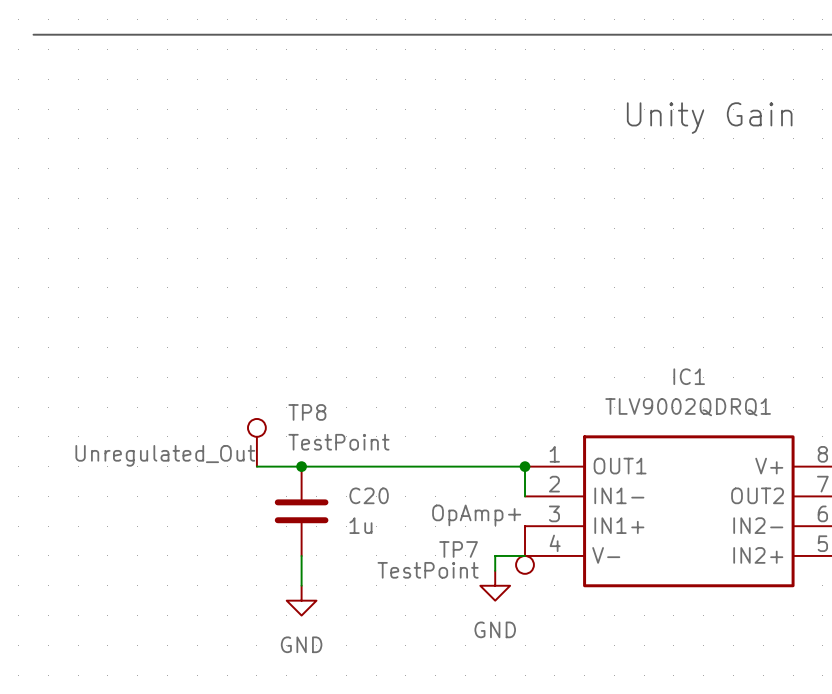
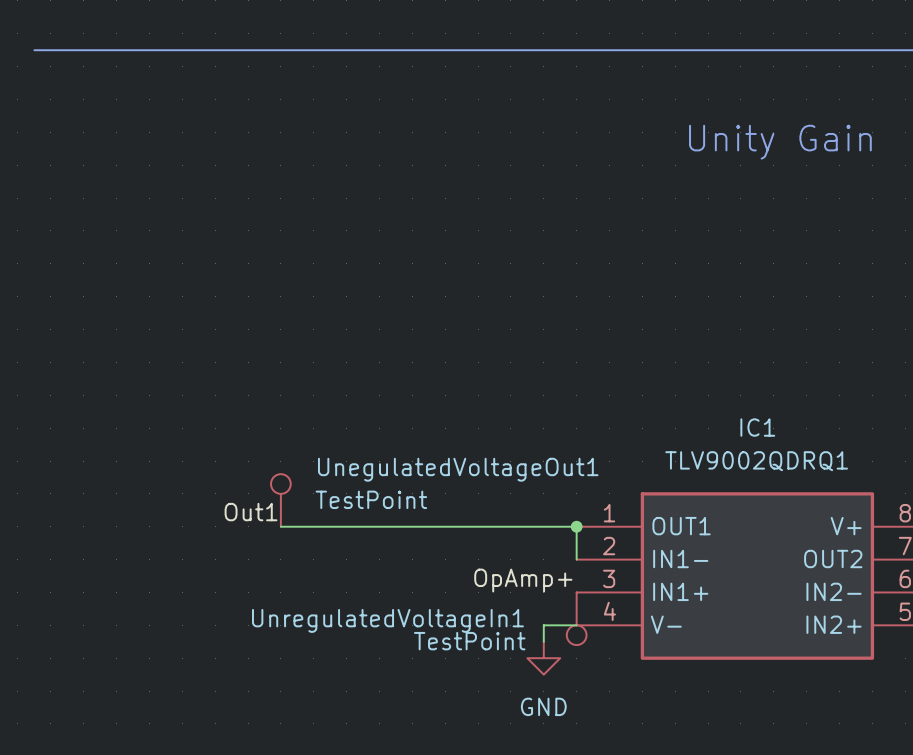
TP8 name: TP8 (307, 412) -> UnegulatedVoltageOut1 (458, 469)
label: Unregulated_Out (165, 455) -> Out1 (251, 512)
junction: (301, 466) -> none
C20: 1u (301, 511) -> none
TP7 name: TP7 (458, 549) -> UnregulatedVoltageIn1 (387, 620)
wire: (301, 555) (301, 585) -> none
power symbol: GND (301, 600) -> none

